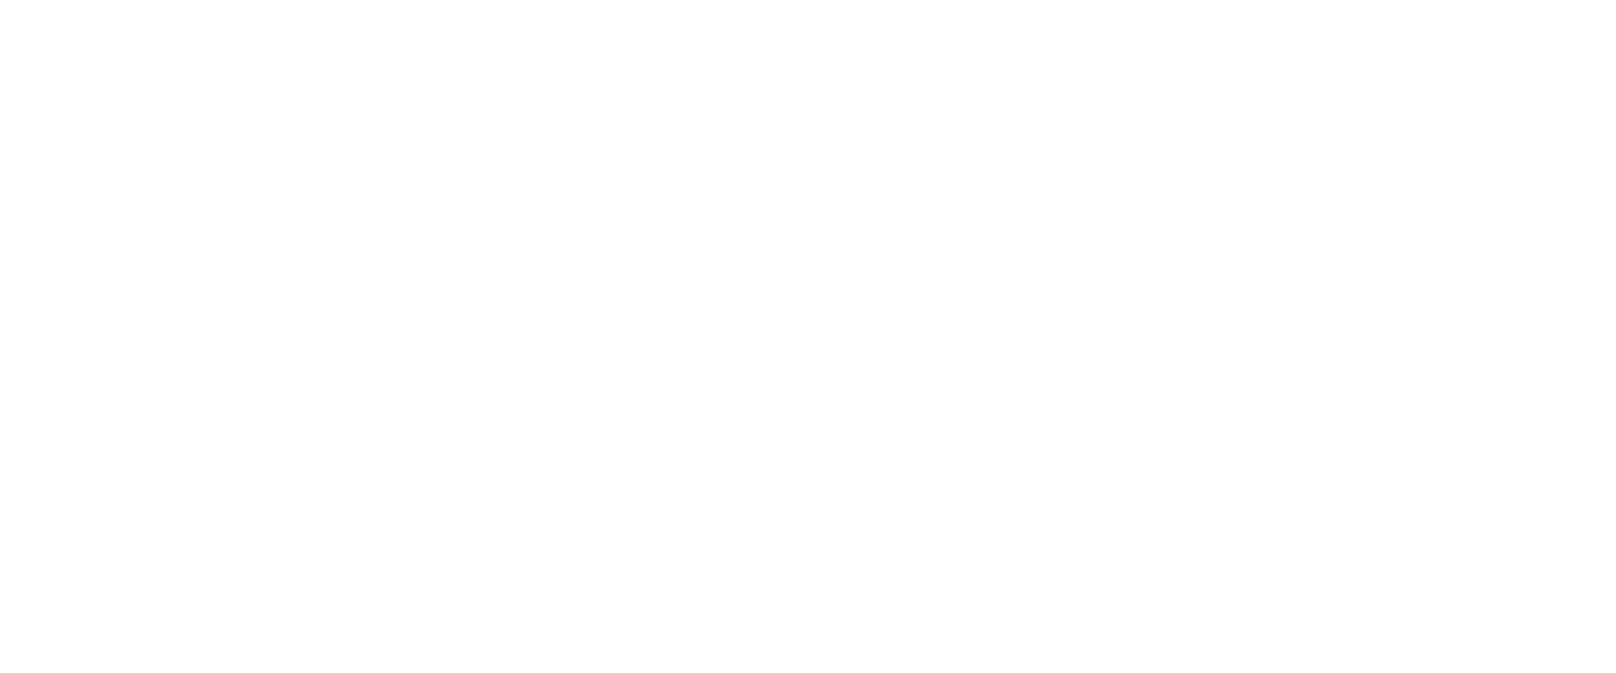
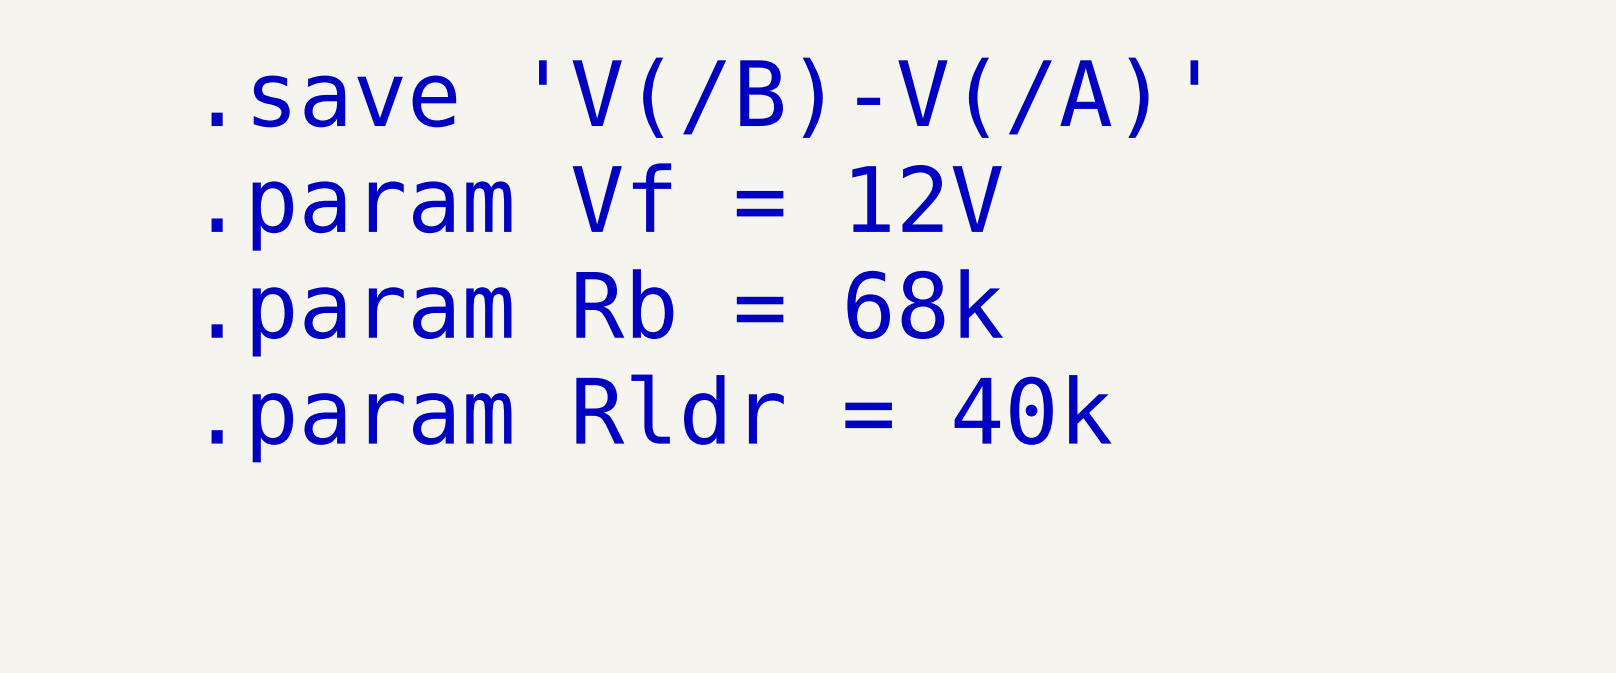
text: none -> .save 'V(/B)-V(/A)' (704, 97)
text: none -> .param Vf = 12V (606, 207)
text: none -> .param Rb = 68k (607, 312)
text: none -> .param Rldr = 40k (661, 418)

